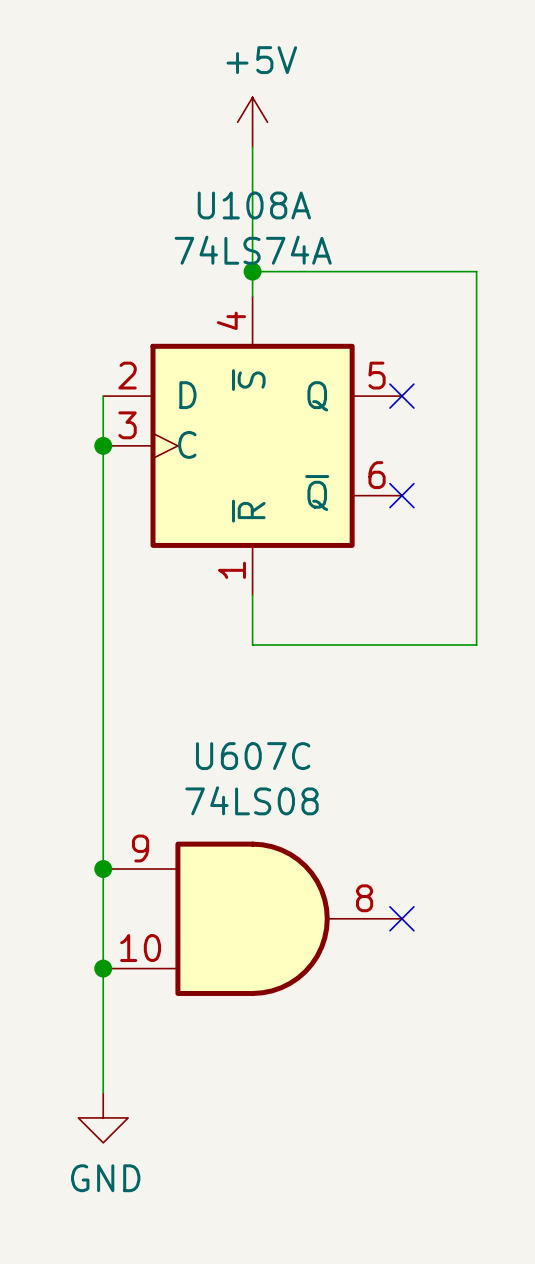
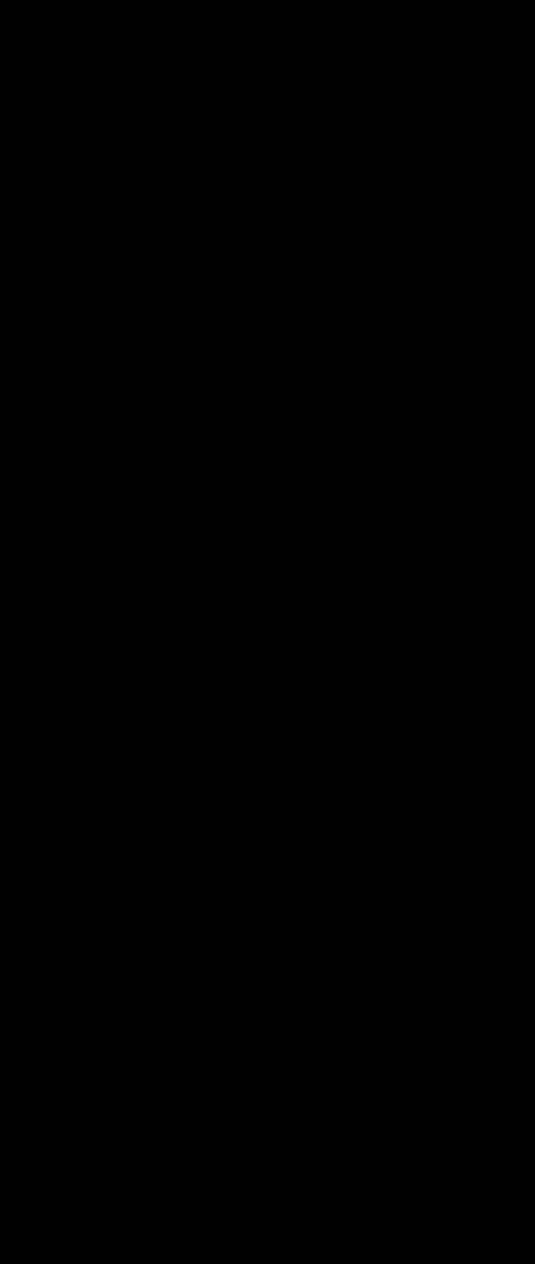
power symbol: +5V (252, 122) -> none
wire: (252, 147) (252, 296) -> none
wire: (252, 271) (476, 271) (476, 645) (252, 645) (252, 595) -> none
junction: (252, 271) -> none
wire: (103, 396) (103, 1093) -> none
no-connect mark: (401, 396) -> none
junction: (103, 445) -> none
U108A: 74LS74A (252, 445) -> none
no-connect mark: (401, 495) -> none
junction: (103, 869) -> none
U607C: 74LS08 (252, 918) -> none
no-connect mark: (401, 918) -> none
junction: (103, 968) -> none
power symbol: GND (103, 1117) -> none

